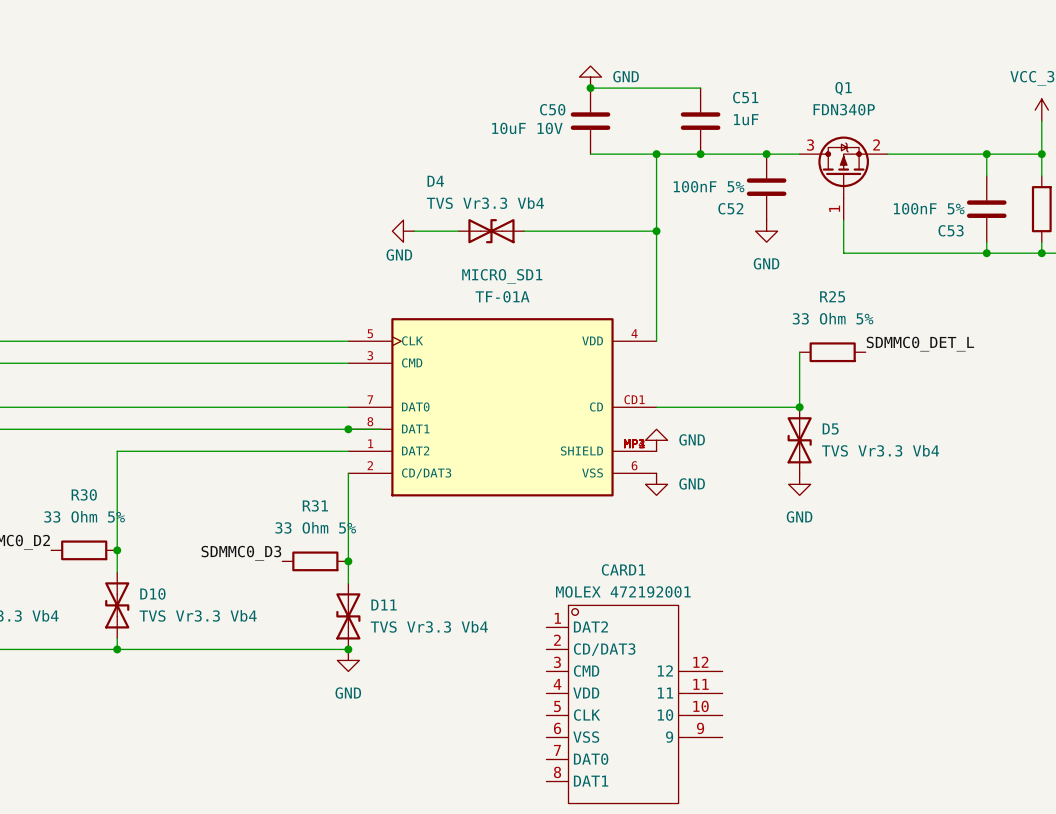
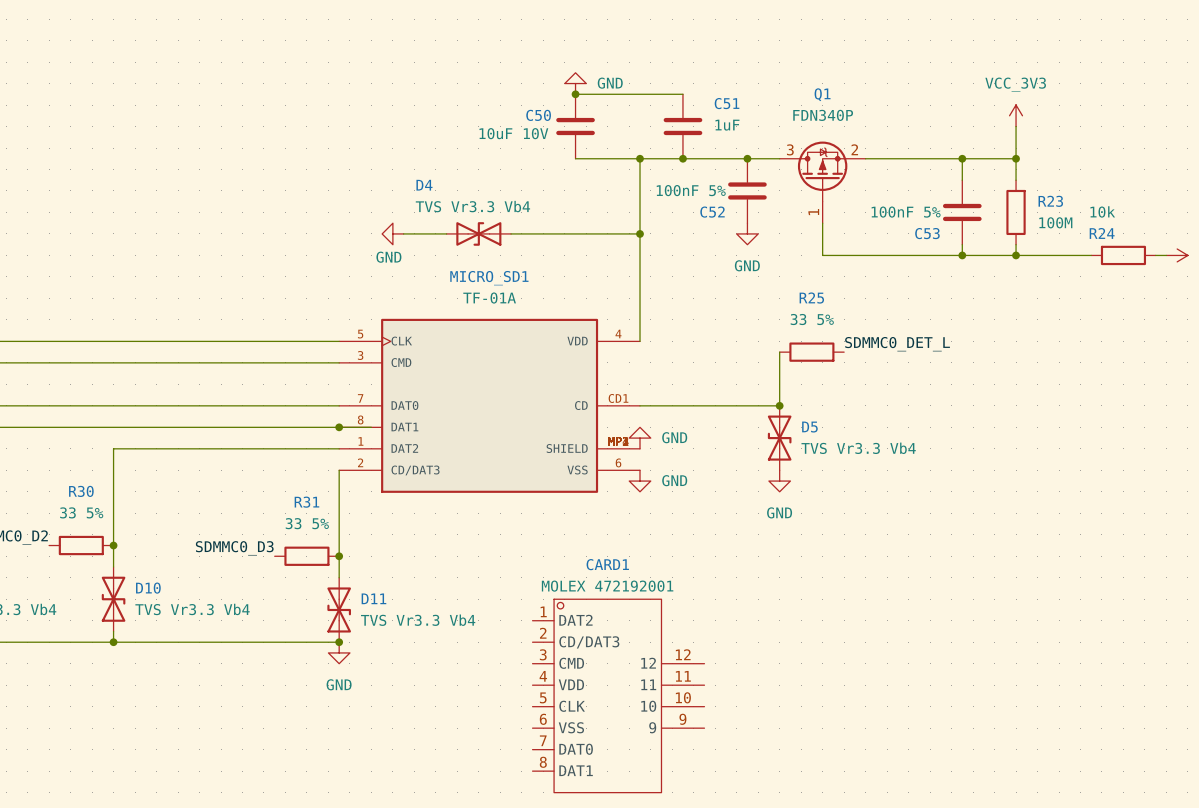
R25 value: 33 Ohm 5% (833, 318) -> 33 5% (812, 319)
R30 value: 33 Ohm 5% (84, 516) -> 33 5% (81, 512)
R31 value: 33 Ohm 5% (315, 527) -> 33 5% (307, 523)

